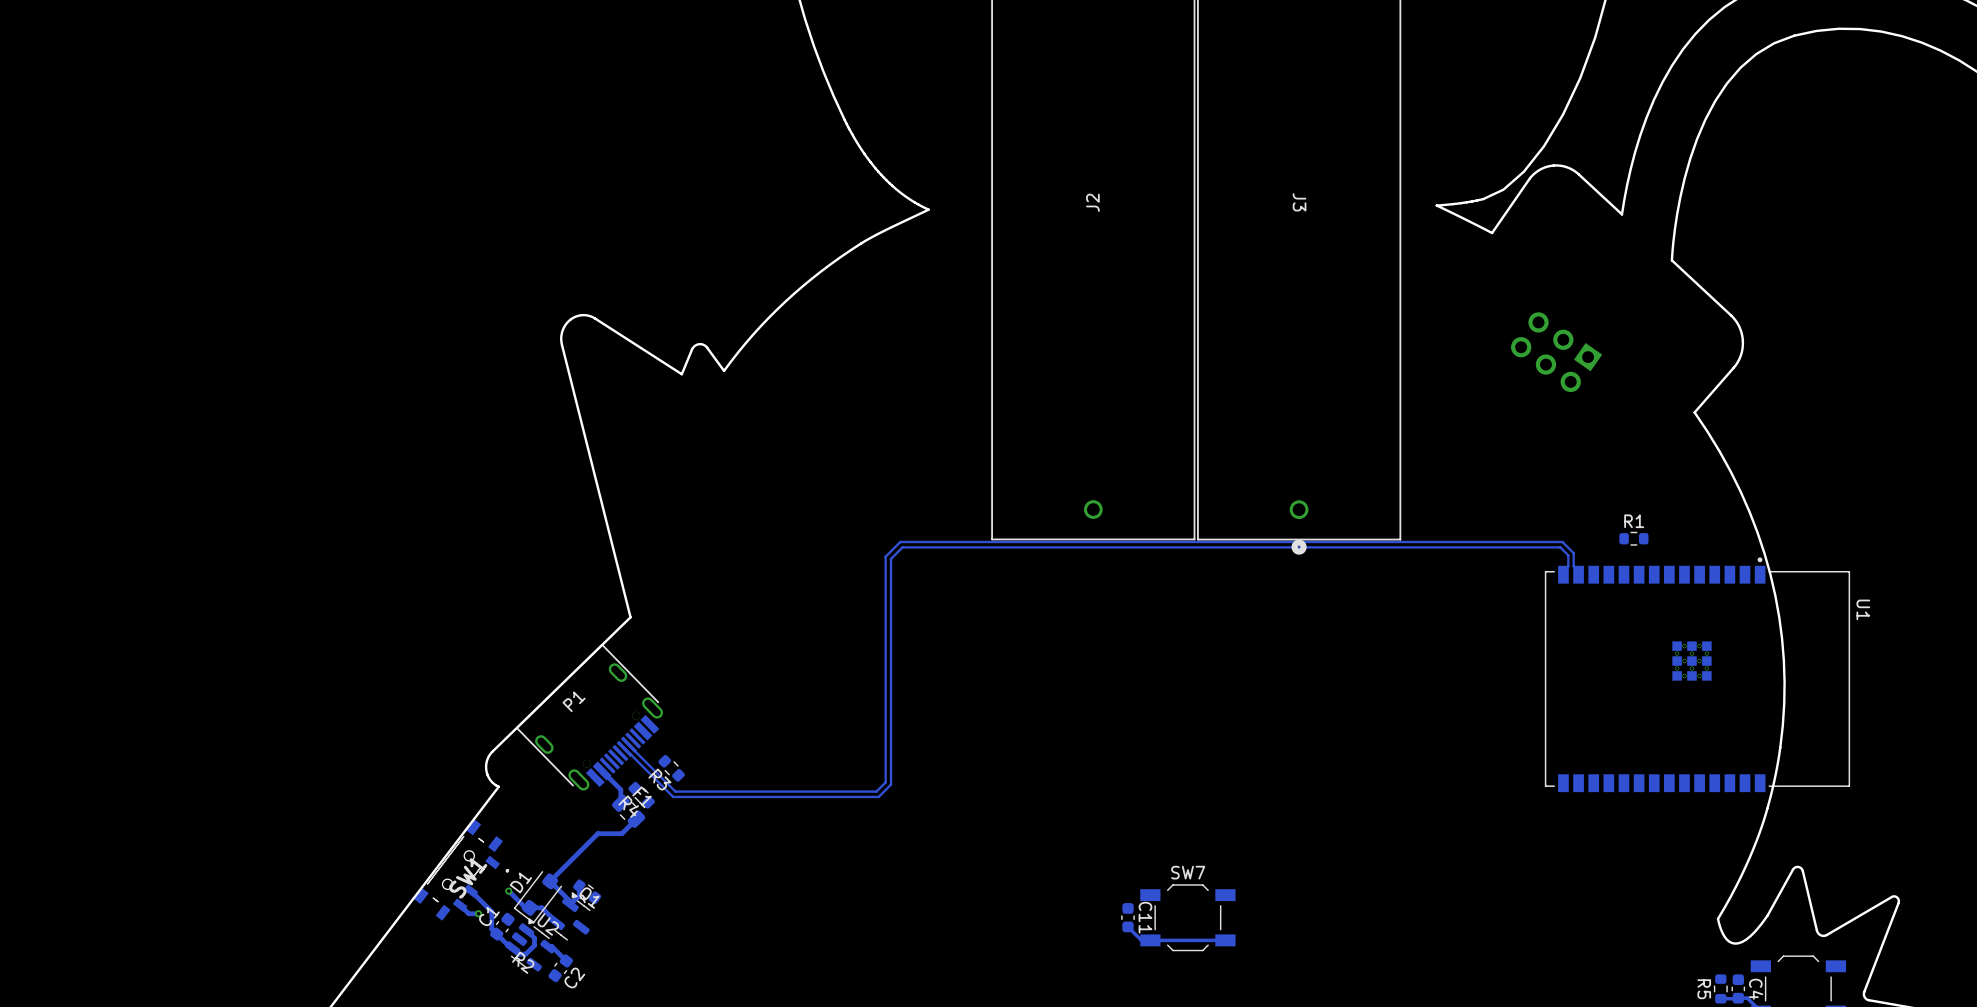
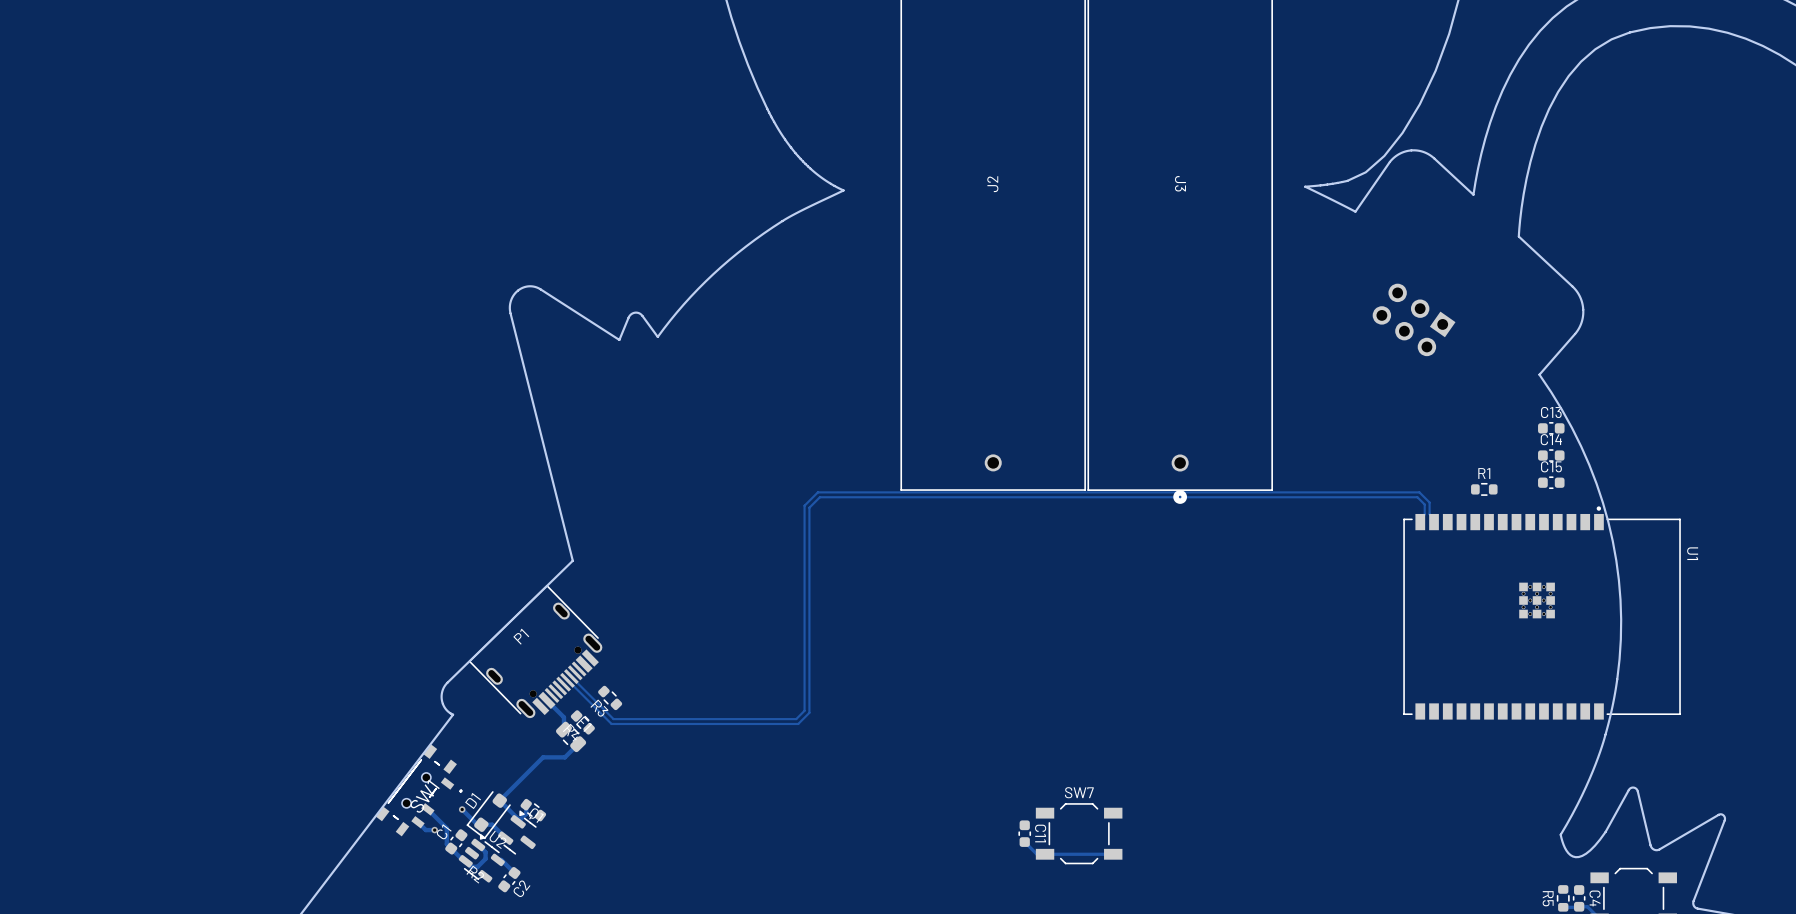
C13: none -> (1551, 428)
C14: none -> (1551, 455)
C15: none -> (1551, 482)

